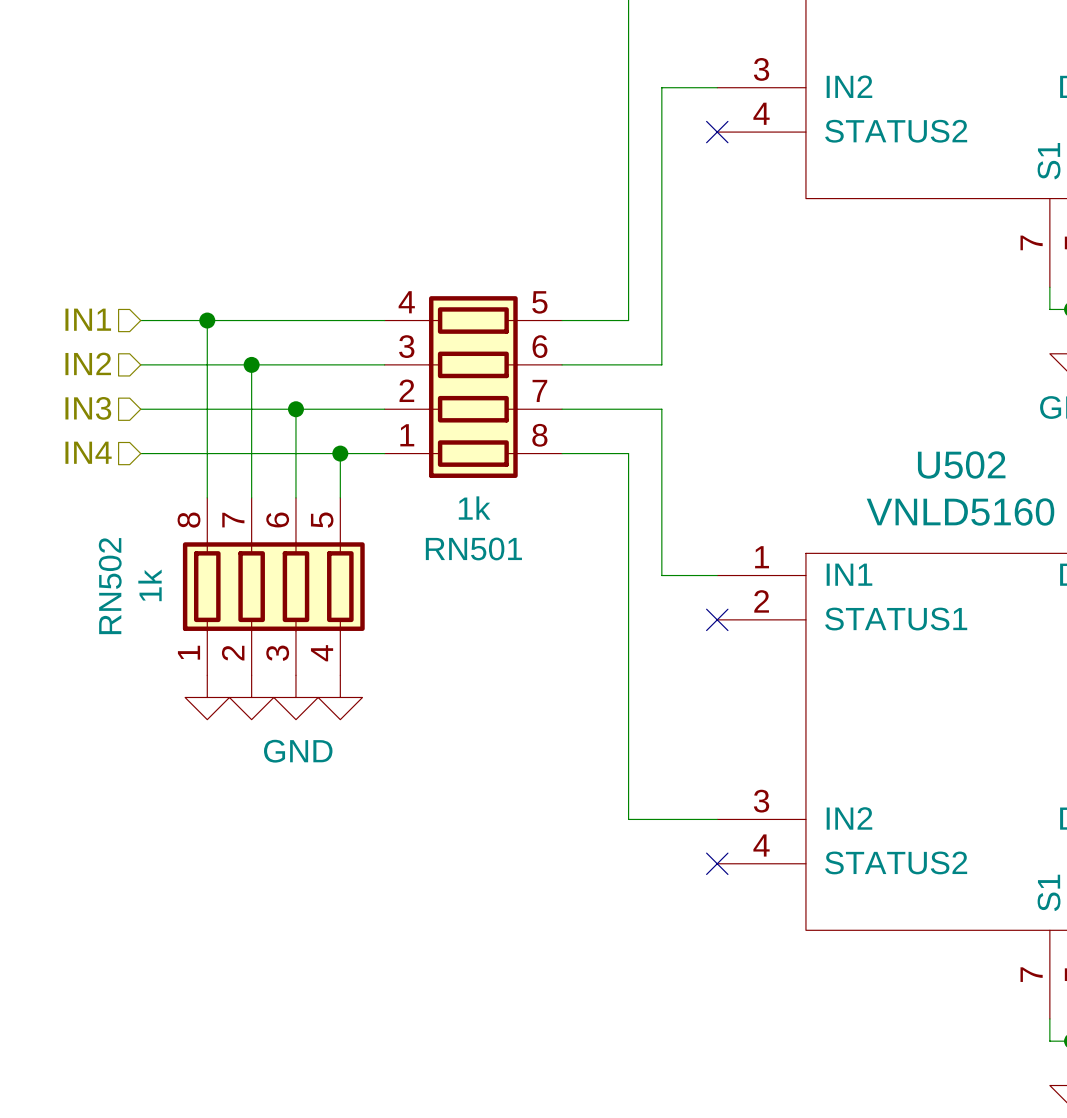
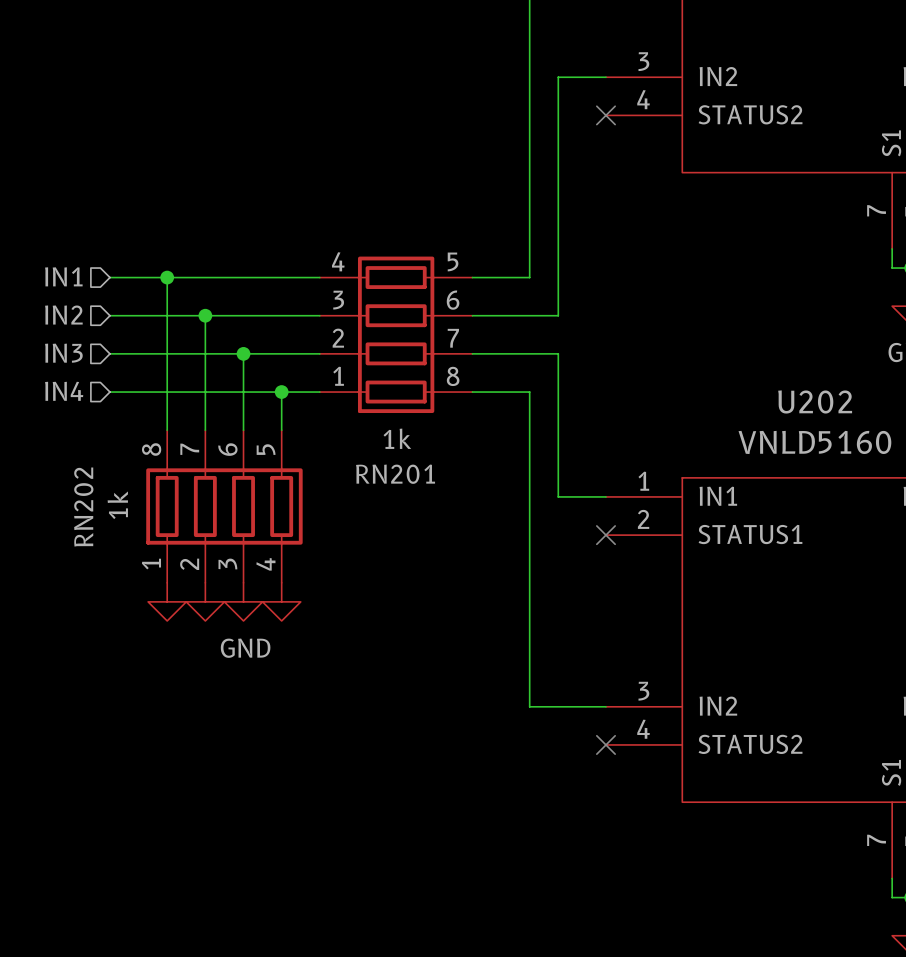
U502 name: U502 (961, 464) -> U202 (815, 401)
RN501 name: RN501 (473, 548) -> RN201 (395, 474)
RN502 name: RN502 (110, 586) -> RN202 (83, 507)

